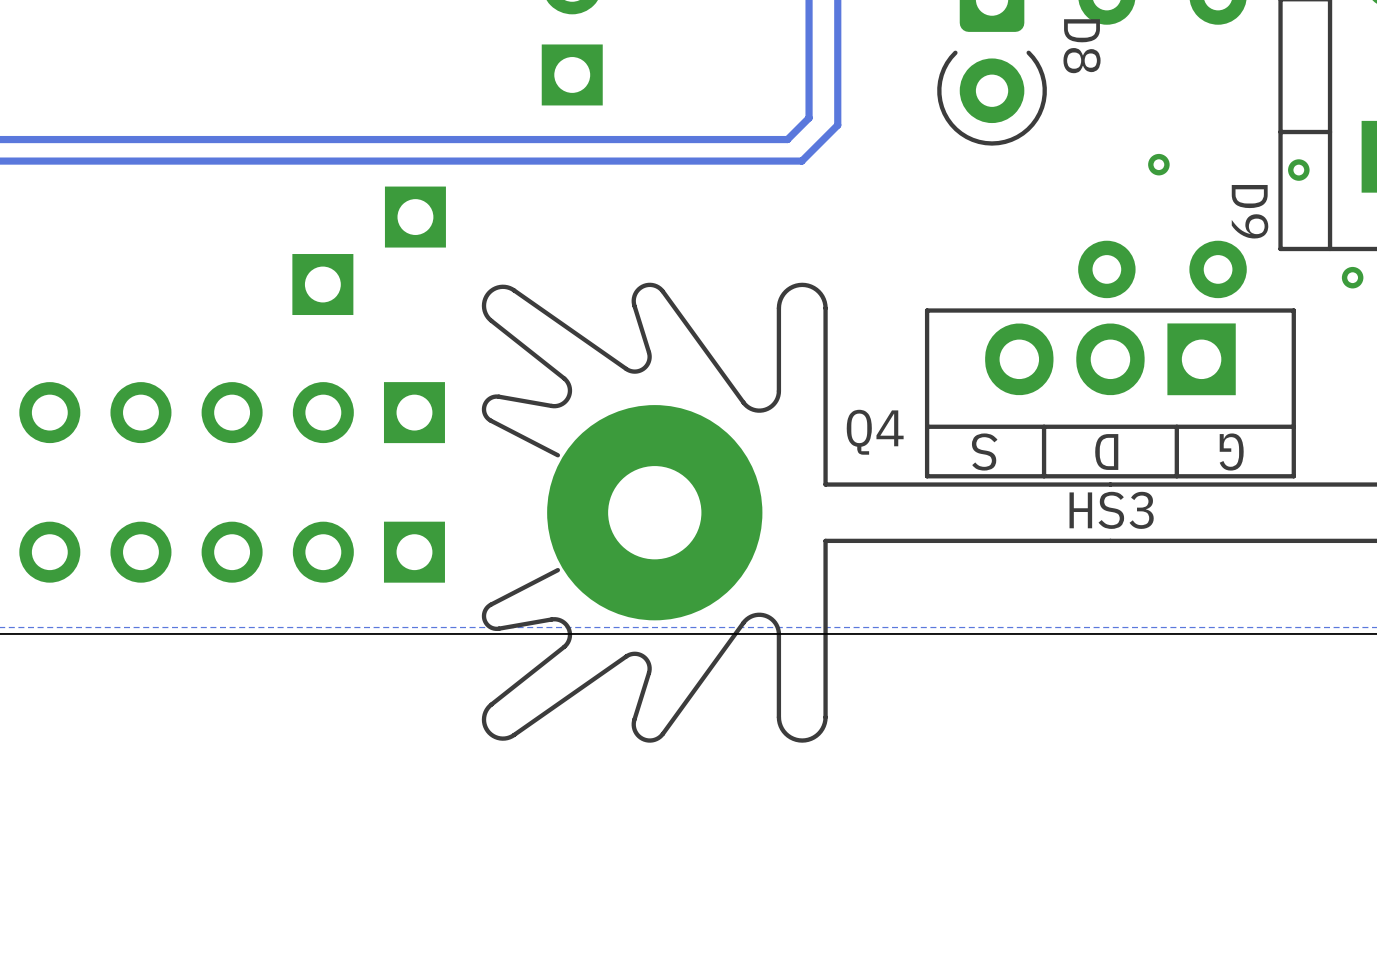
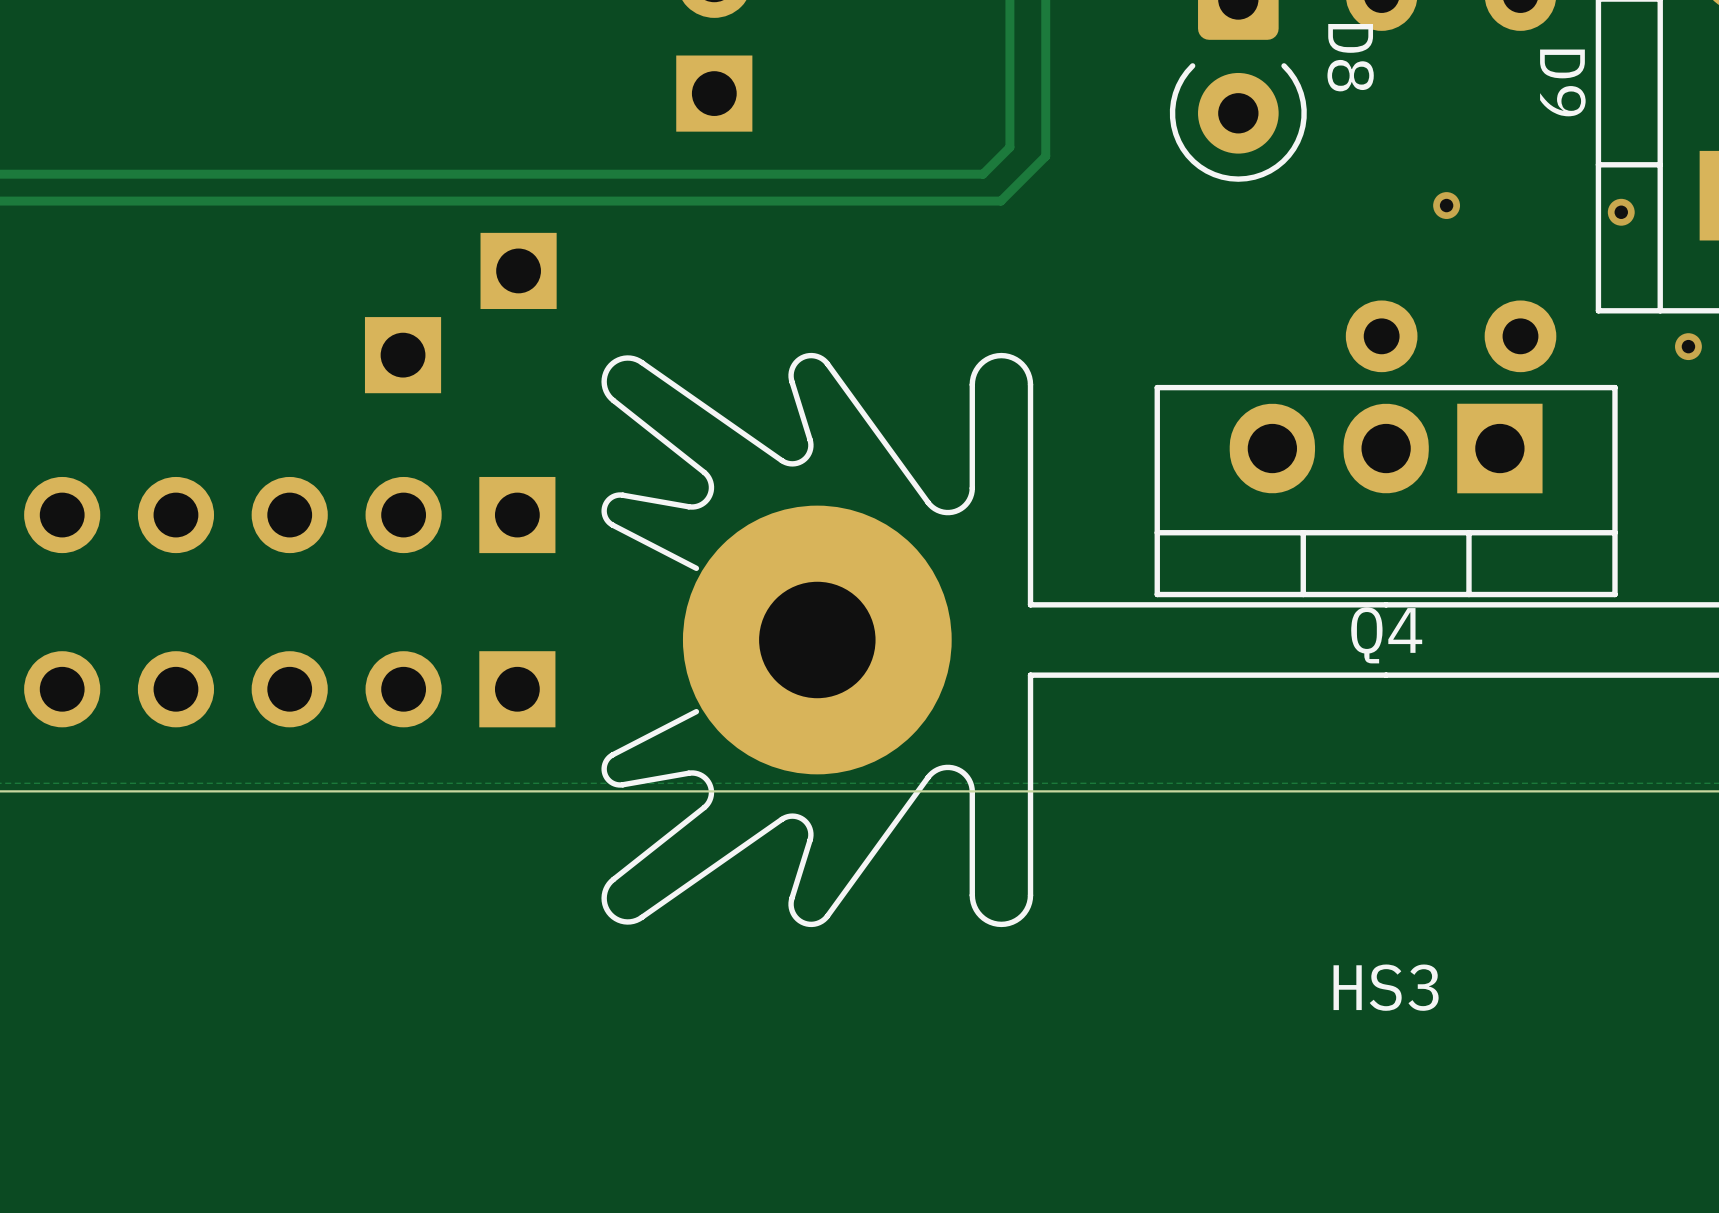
D9 name position: D9 (1250, 211) -> D9 (1562, 82)
Q4 name position: Q4 (875, 432) -> Q4 (1386, 635)
text: G D S (1107, 452) -> none
HS3 name position: HS3 (1111, 510) -> HS3 (1386, 987)

